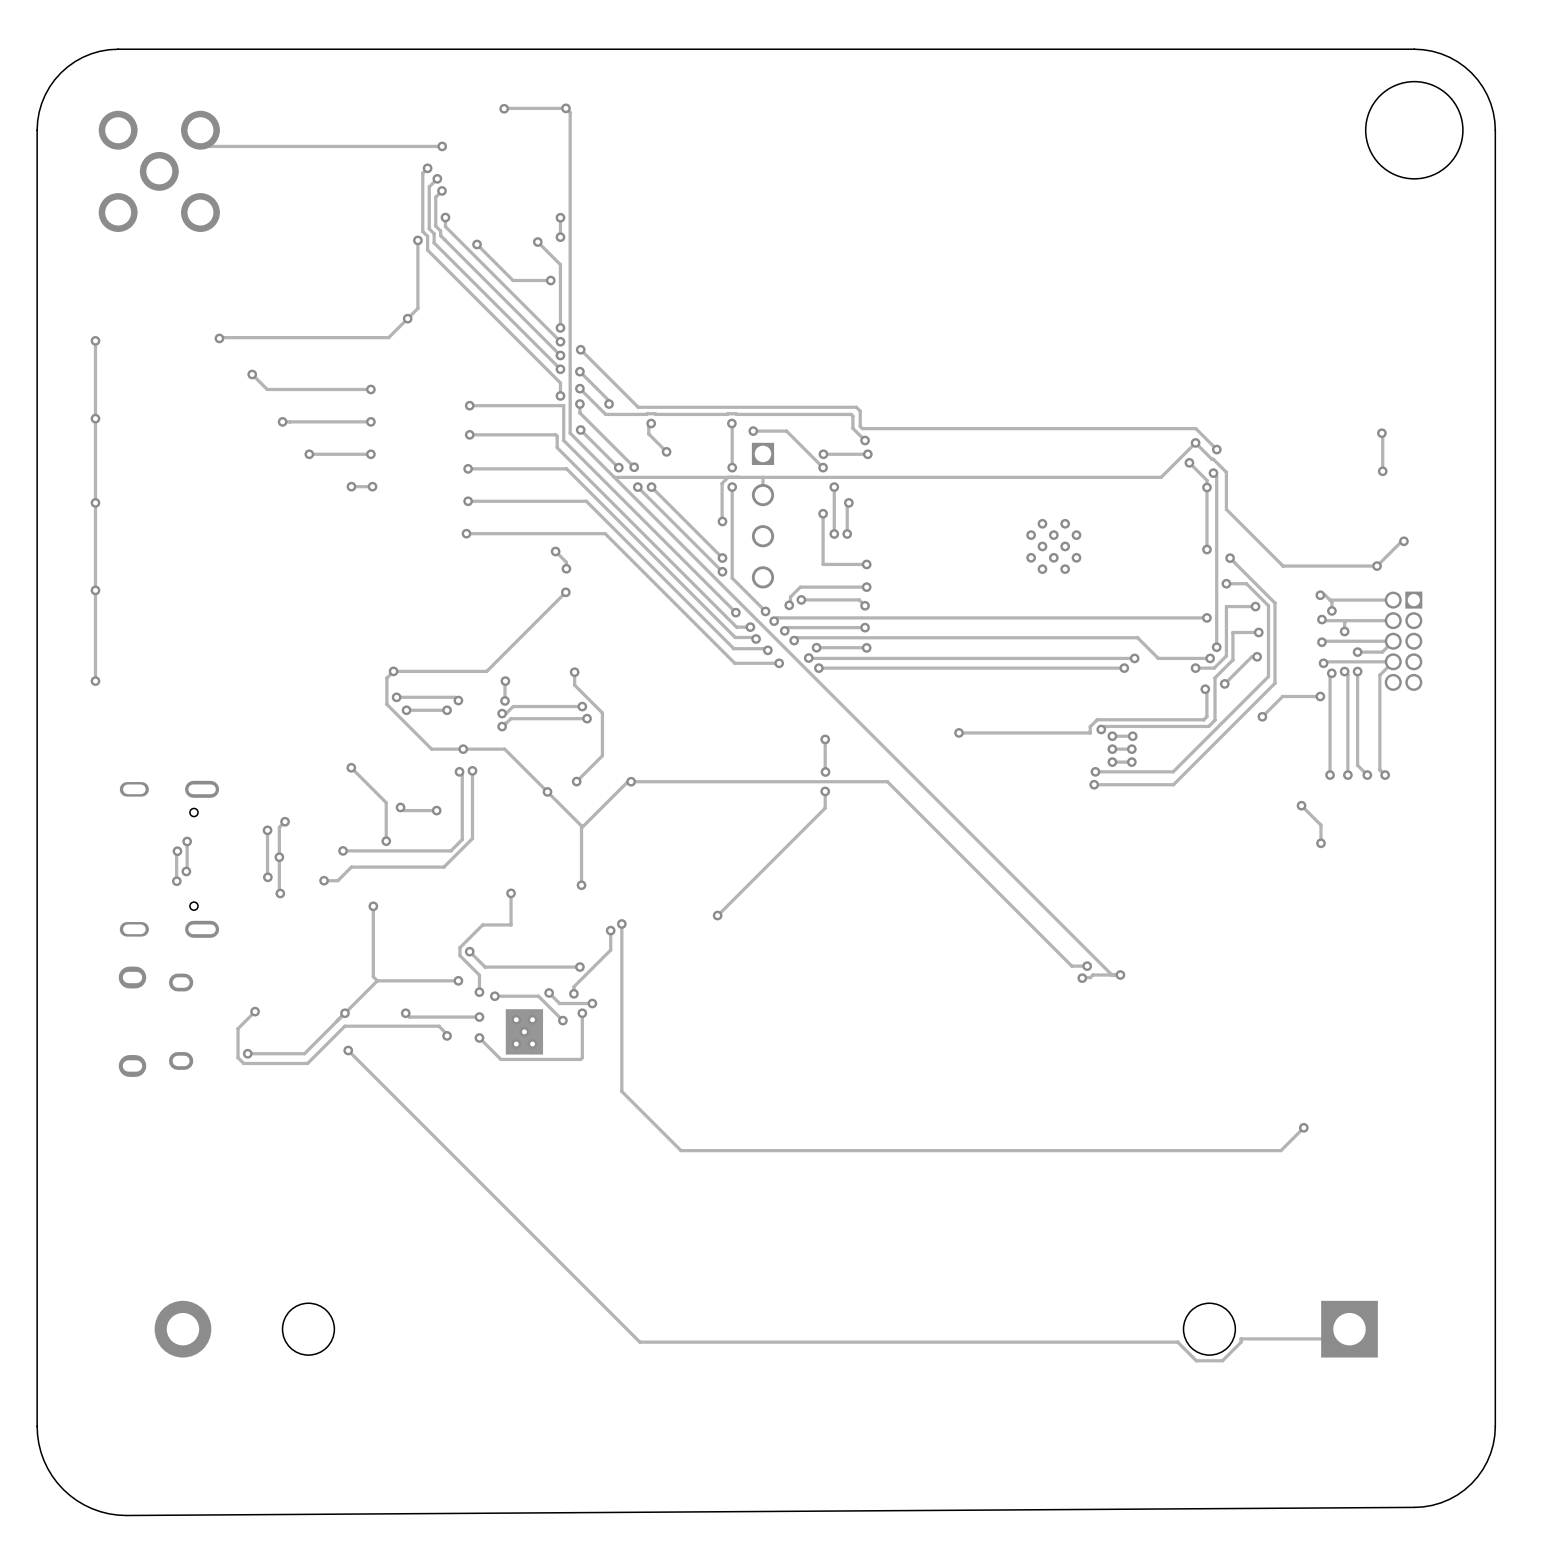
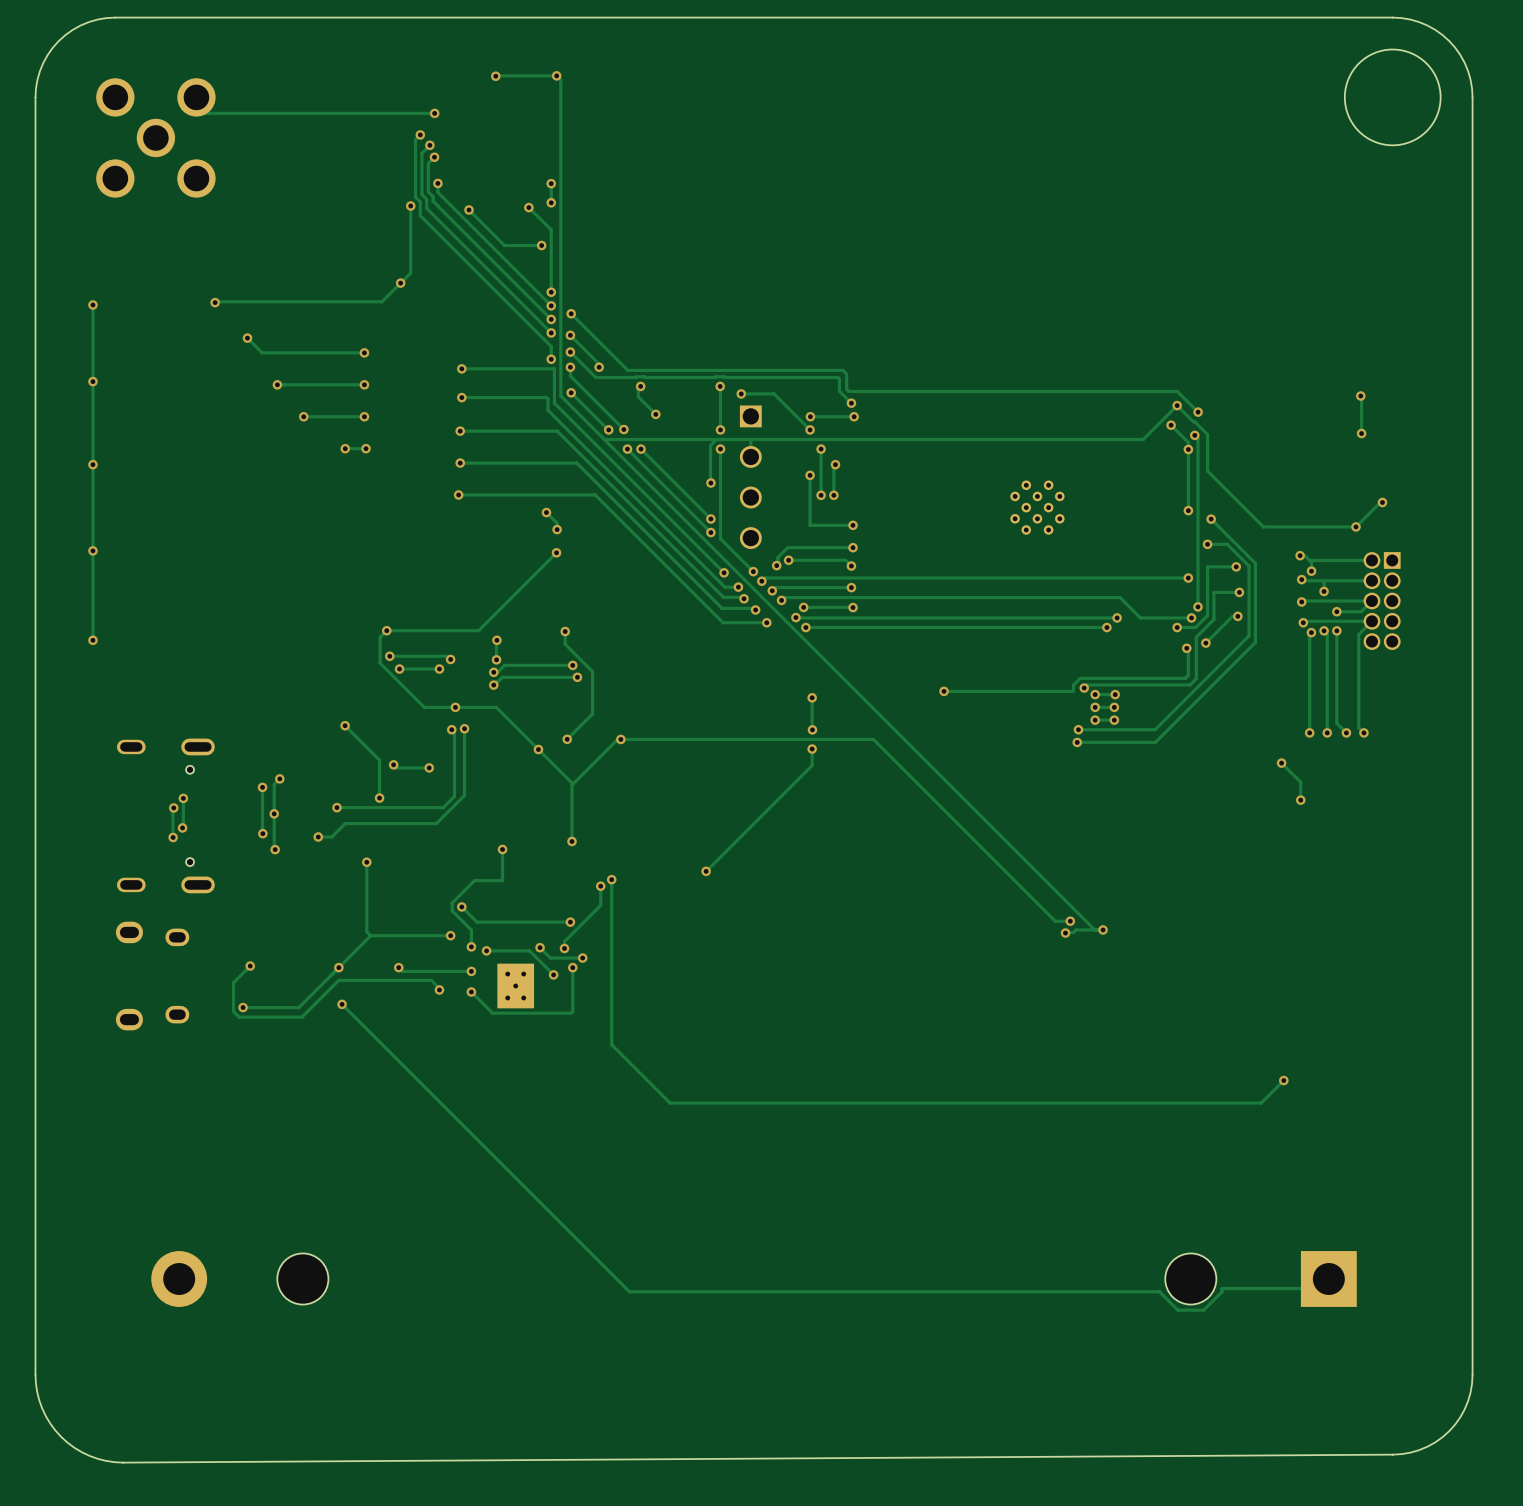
track: (1320, 696) (1282, 696) (1262, 716) -> none
via: (1320, 696) -> none
via: (1262, 716) -> none

